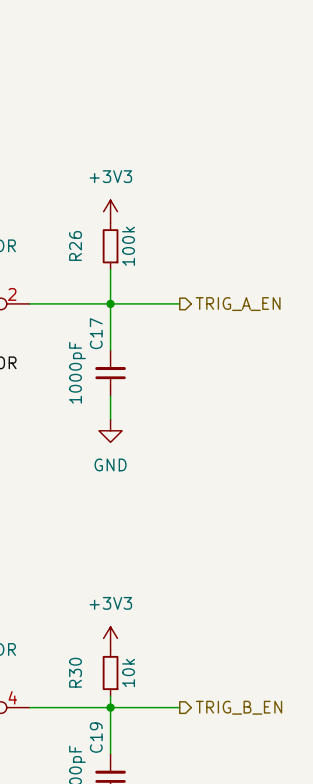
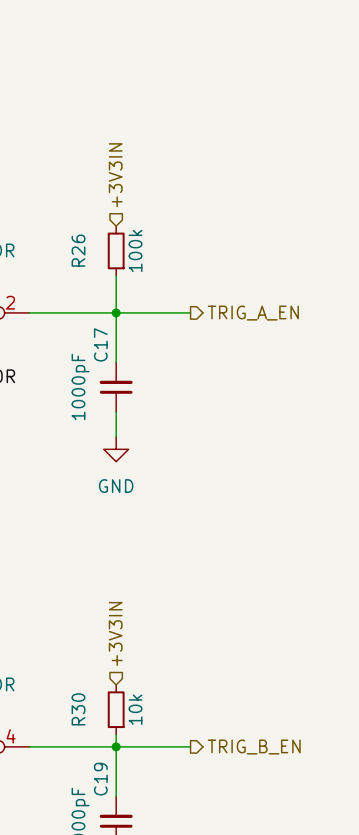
hierarchical label: none -> +3V3IN (115, 175)
power symbol: +3V3 (110, 211) -> none
hierarchical label: none -> +3V3IN (115, 633)
power symbol: +3V3 (110, 638) -> none

